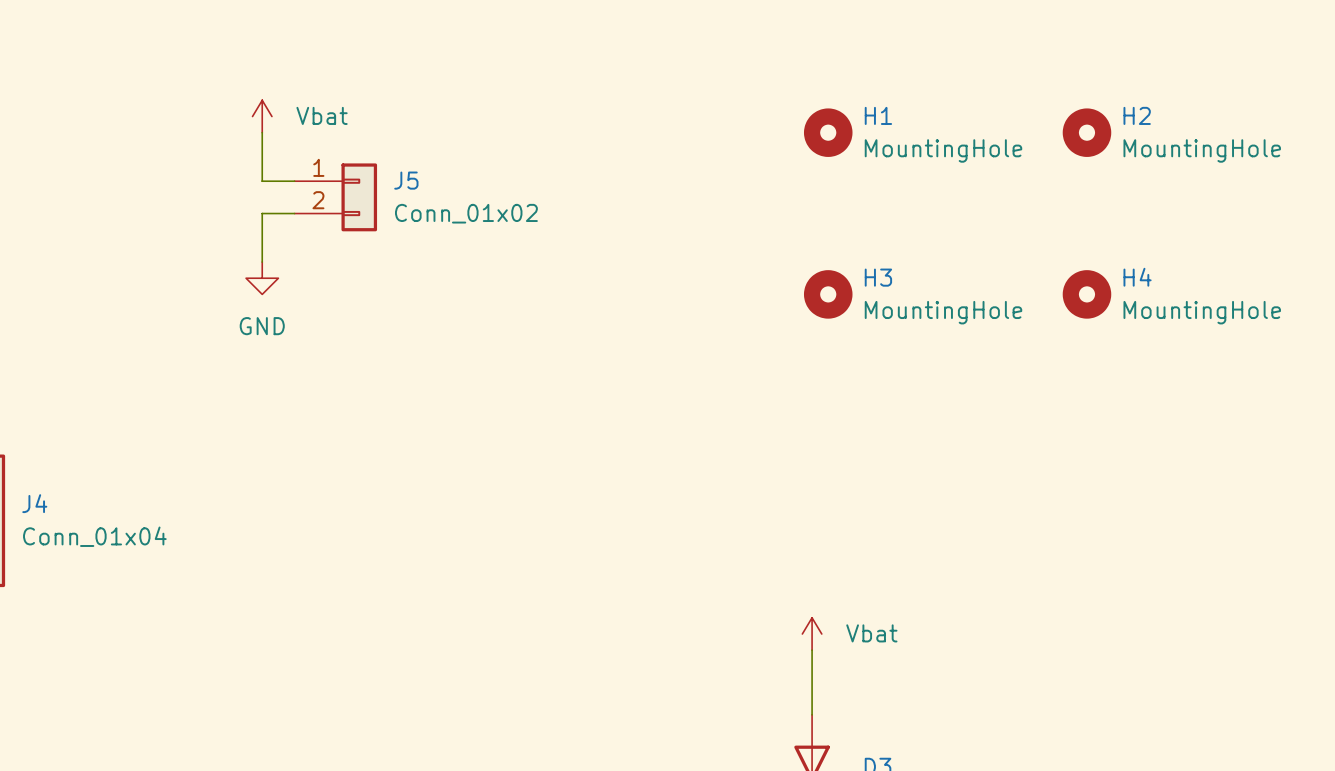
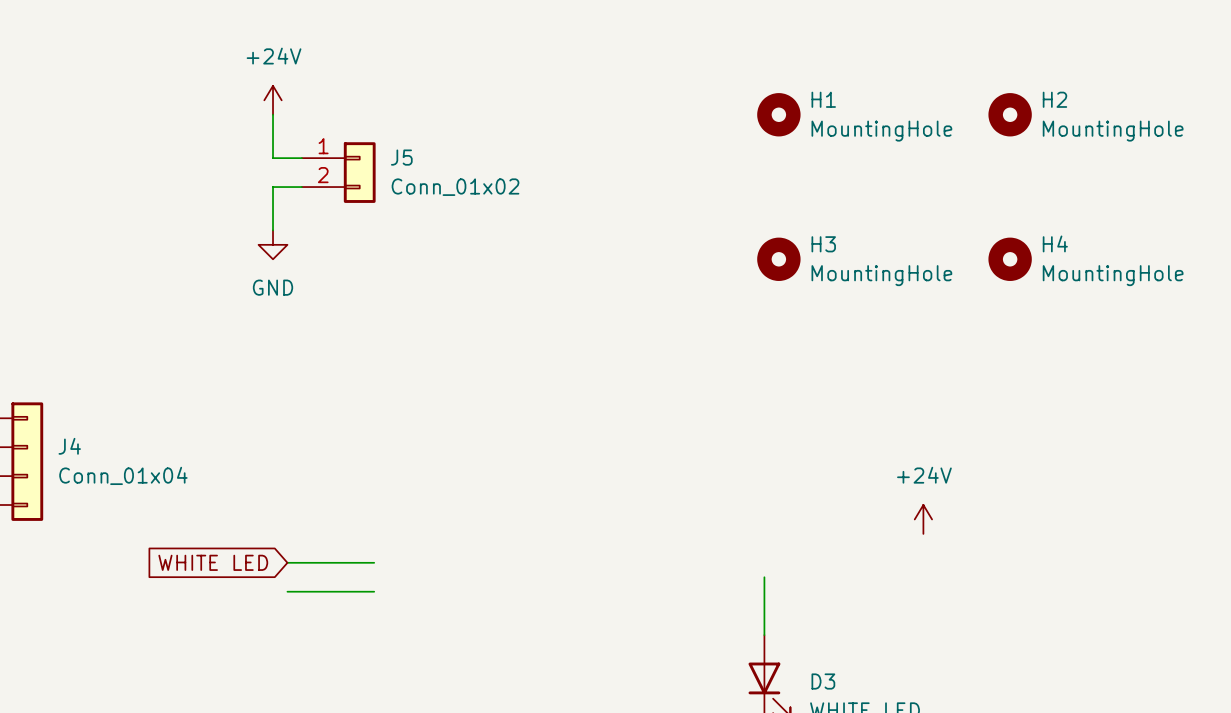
power symbol: Vbat (262, 116) -> +24V (273, 100)
power symbol: none -> +24V (923, 519)
global label: none -> WHITE LED (213, 562)
wire: none -> (287, 562) (374, 562)
power symbol: Vbat (812, 634) -> none
wire: none -> (287, 591) (374, 591)

